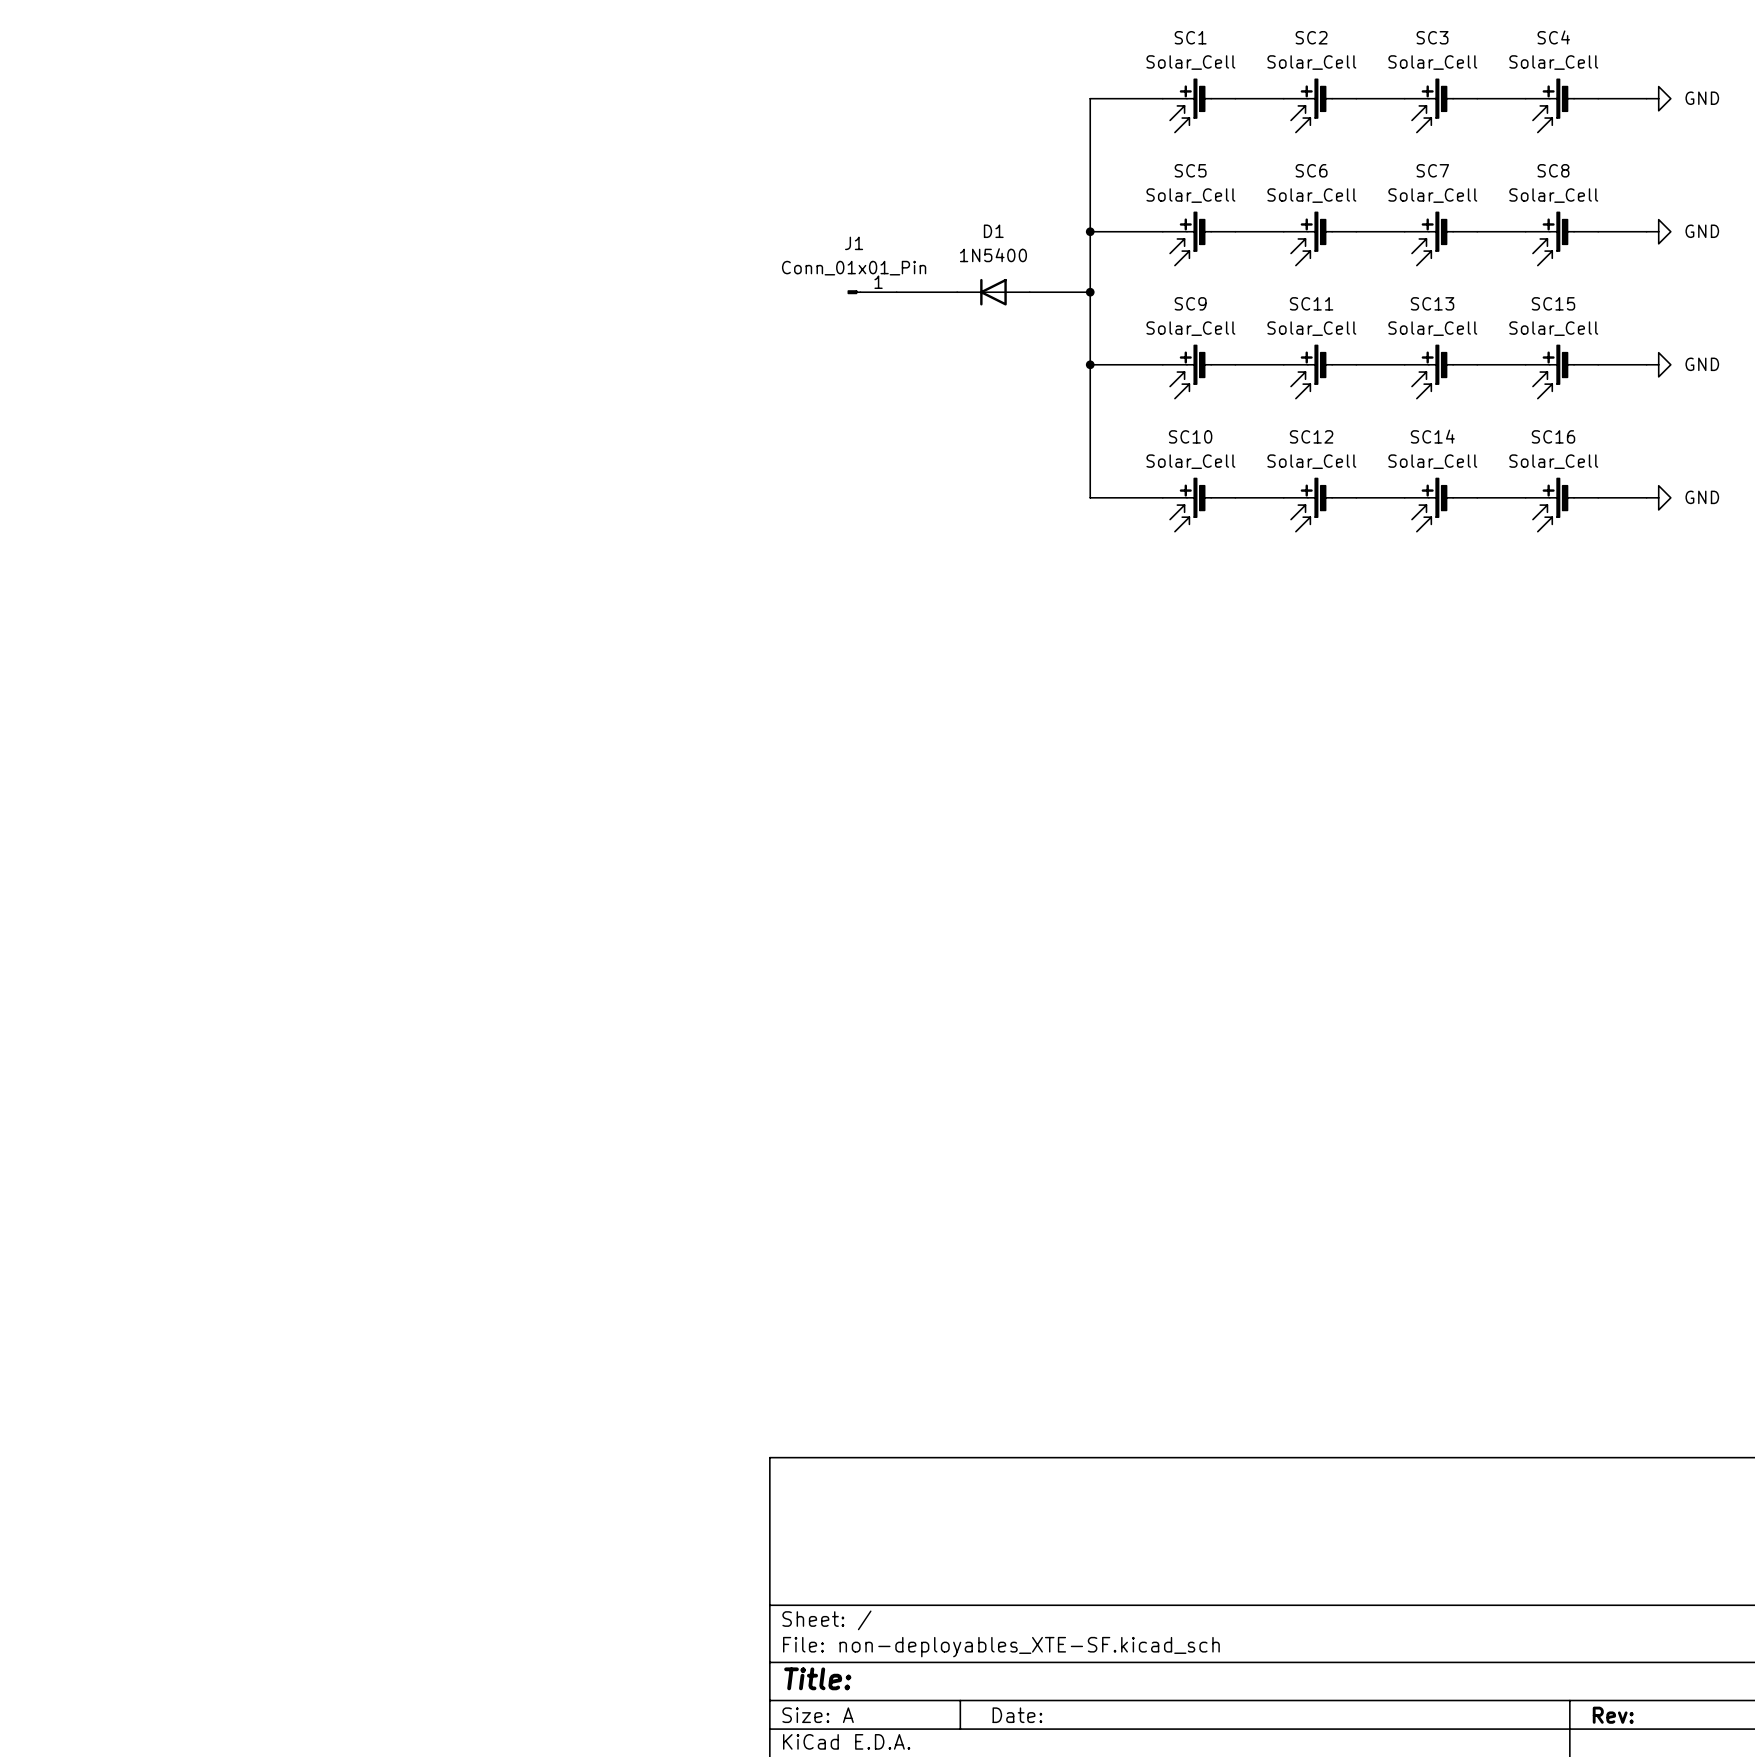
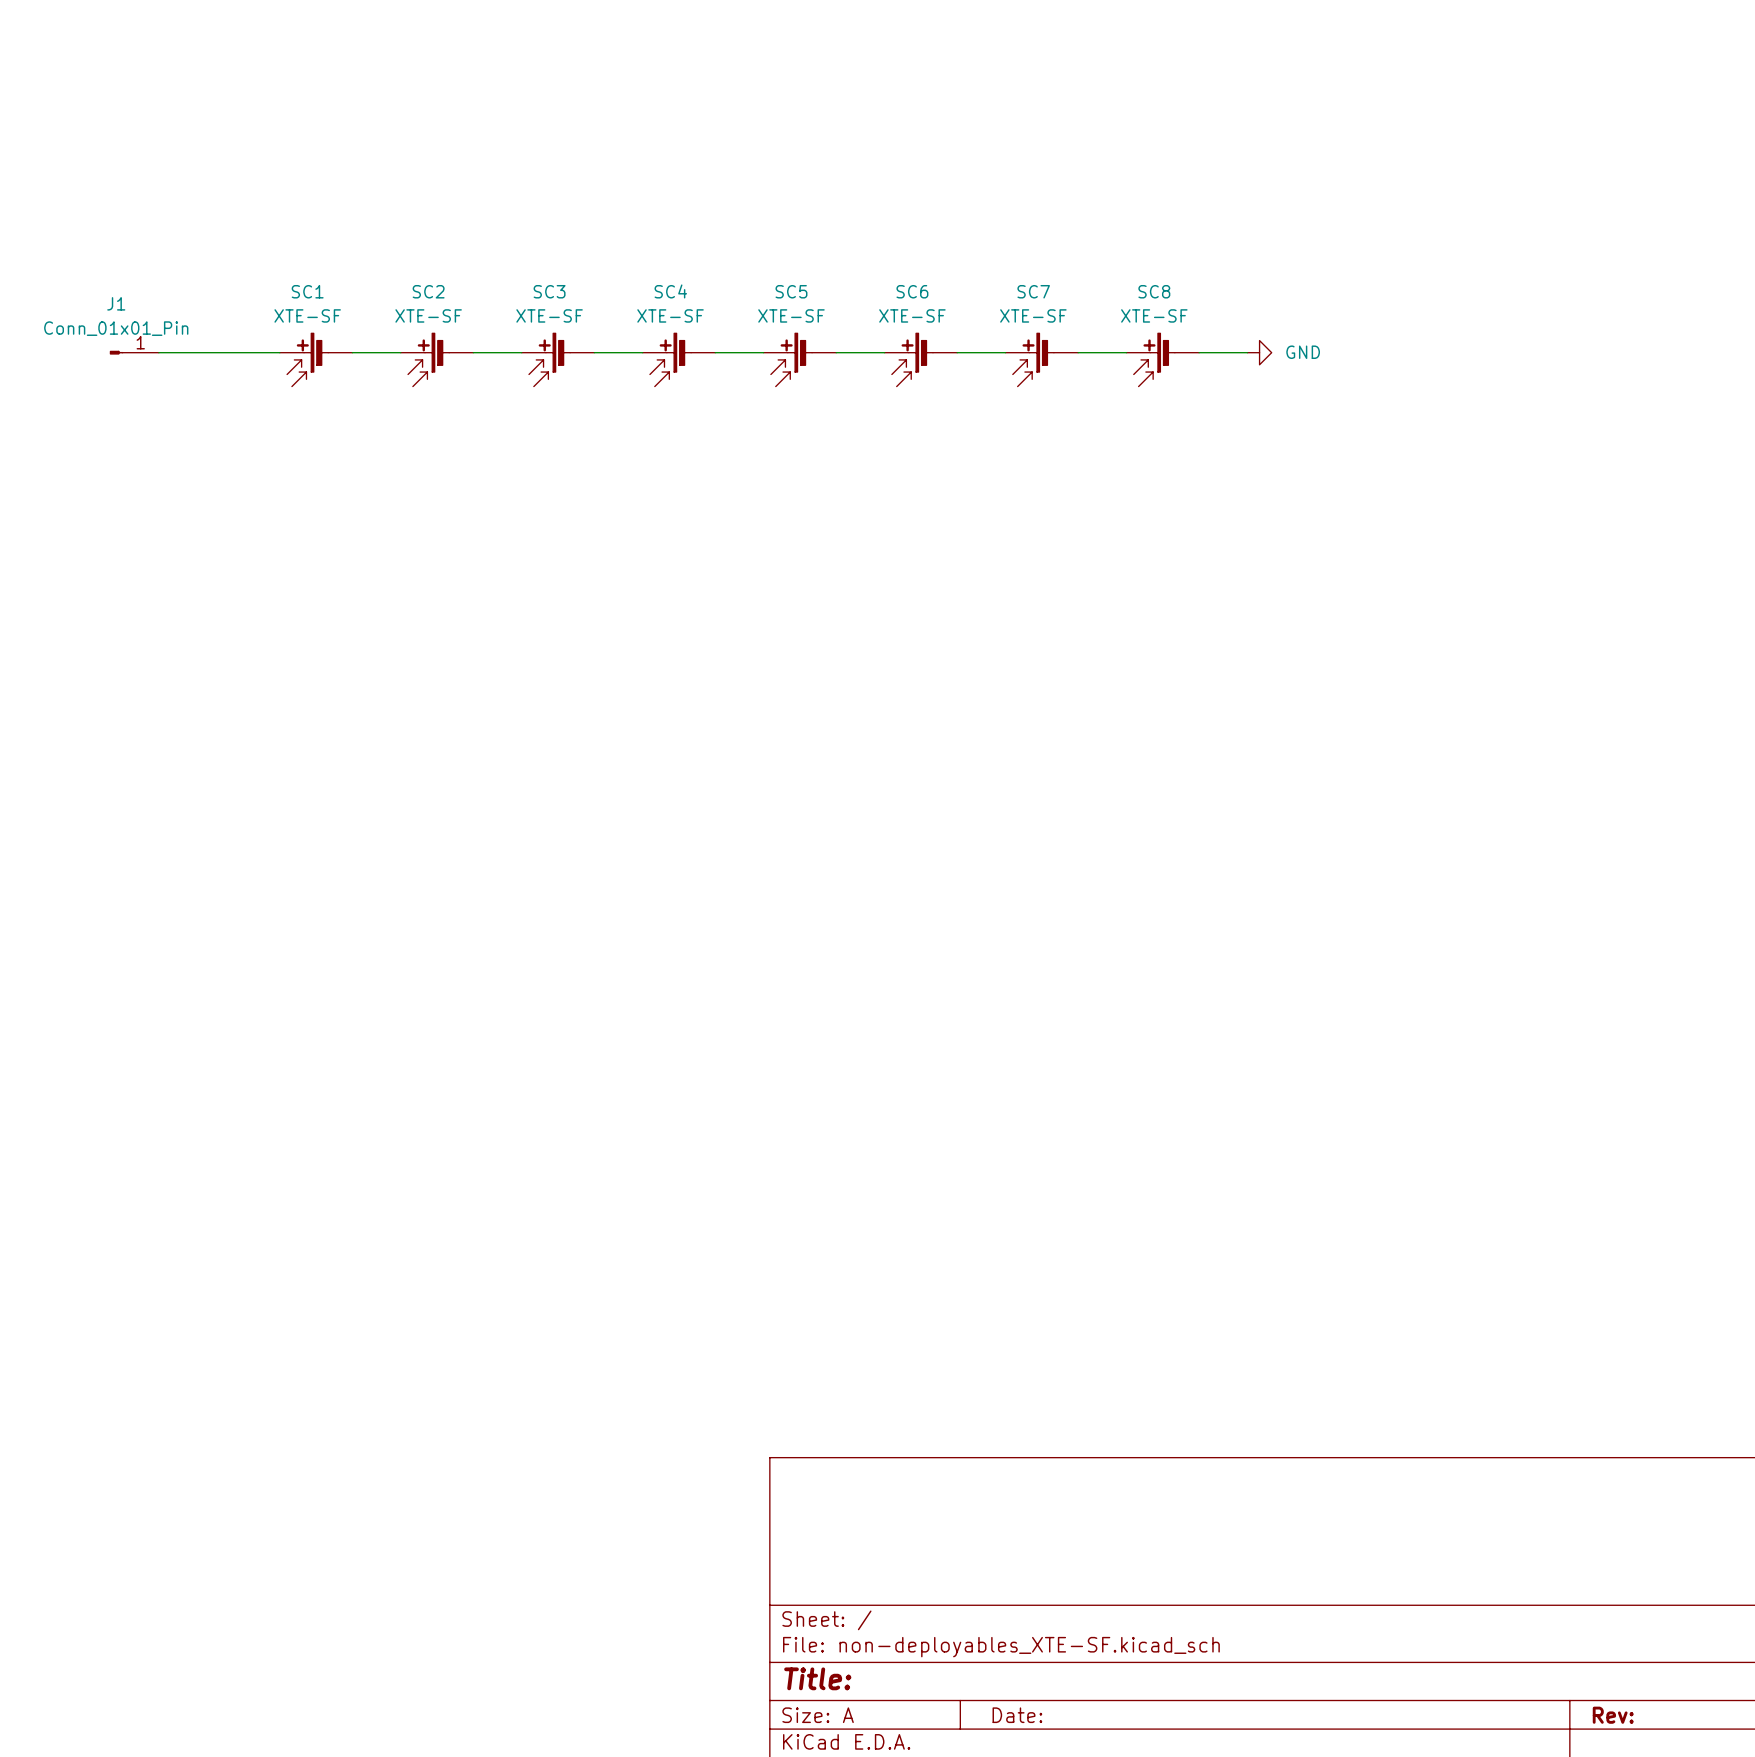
SC1 value: Solar_Cell (1190, 62) -> XTE-SF (307, 315)
SC2 value: Solar_Cell (1311, 62) -> XTE-SF (428, 315)
SC3 value: Solar_Cell (1432, 62) -> XTE-SF (549, 315)
SC4 value: Solar_Cell (1553, 62) -> XTE-SF (670, 315)
wire: (1162, 98) (1090, 98) (1090, 497) (1162, 497) -> none
wire: (1235, 98) (1283, 98) -> none
wire: (1356, 98) (1404, 98) -> none
wire: (1477, 98) (1525, 98) -> none
wire: (1598, 98) (1646, 98) -> none
power symbol: GND (1658, 98) -> none
SC1 position: (1199, 105) -> (316, 359)
SC2 position: (1320, 105) -> (437, 359)
SC3 position: (1441, 105) -> (558, 359)
SC4 position: (1561, 105) -> (678, 359)
SC5 value: Solar_Cell (1190, 195) -> XTE-SF (791, 315)
SC6 value: Solar_Cell (1311, 195) -> XTE-SF (912, 315)
SC7 value: Solar_Cell (1432, 195) -> XTE-SF (1033, 315)
SC8 value: Solar_Cell (1553, 195) -> XTE-SF (1154, 315)
wire: (1090, 231) (1162, 231) -> none
junction: (1090, 231) -> none
wire: (1235, 231) (1283, 231) -> none
wire: (1356, 231) (1404, 231) -> none
wire: (1477, 231) (1525, 231) -> none
wire: (1598, 231) (1646, 231) -> none
power symbol: GND (1658, 231) -> none
SC5 position: (1199, 238) -> (799, 359)
SC6 position: (1320, 238) -> (920, 359)
SC7 position: (1441, 238) -> (1041, 359)
SC8 position: (1561, 238) -> (1162, 359)
J1 position: (872, 292) -> (134, 352)
wire: (896, 292) (957, 292) -> none
D1: 1N5400 (993, 292) -> none
wire: (1029, 292) (1090, 292) -> none
junction: (1090, 292) -> none
wire: none -> (158, 352) (279, 352)
wire: none -> (352, 352) (400, 352)
wire: none -> (473, 352) (521, 352)
wire: none -> (594, 352) (642, 352)
wire: none -> (715, 352) (763, 352)
wire: none -> (836, 352) (884, 352)
wire: none -> (957, 352) (1005, 352)
power symbol: none -> GND (1259, 352)
wire: (1090, 364) (1162, 364) -> none
junction: (1090, 364) -> none
wire: (1235, 364) (1283, 364) -> (1078, 352) (1126, 352)
wire: (1356, 364) (1404, 364) -> (1199, 352) (1247, 352)
wire: (1477, 364) (1525, 364) -> none
wire: (1598, 364) (1646, 364) -> none
power symbol: GND (1658, 364) -> none
SC9: Solar_Cell (1199, 372) -> none
SC11: Solar_Cell (1320, 372) -> none
SC13: Solar_Cell (1441, 372) -> none
SC15: Solar_Cell (1561, 372) -> none
wire: (1235, 497) (1283, 497) -> none
wire: (1356, 497) (1404, 497) -> none
wire: (1477, 497) (1525, 497) -> none
wire: (1598, 497) (1646, 497) -> none
power symbol: GND (1658, 497) -> none
SC10: Solar_Cell (1199, 505) -> none
SC12: Solar_Cell (1320, 505) -> none
SC14: Solar_Cell (1441, 505) -> none
SC16: Solar_Cell (1561, 505) -> none

